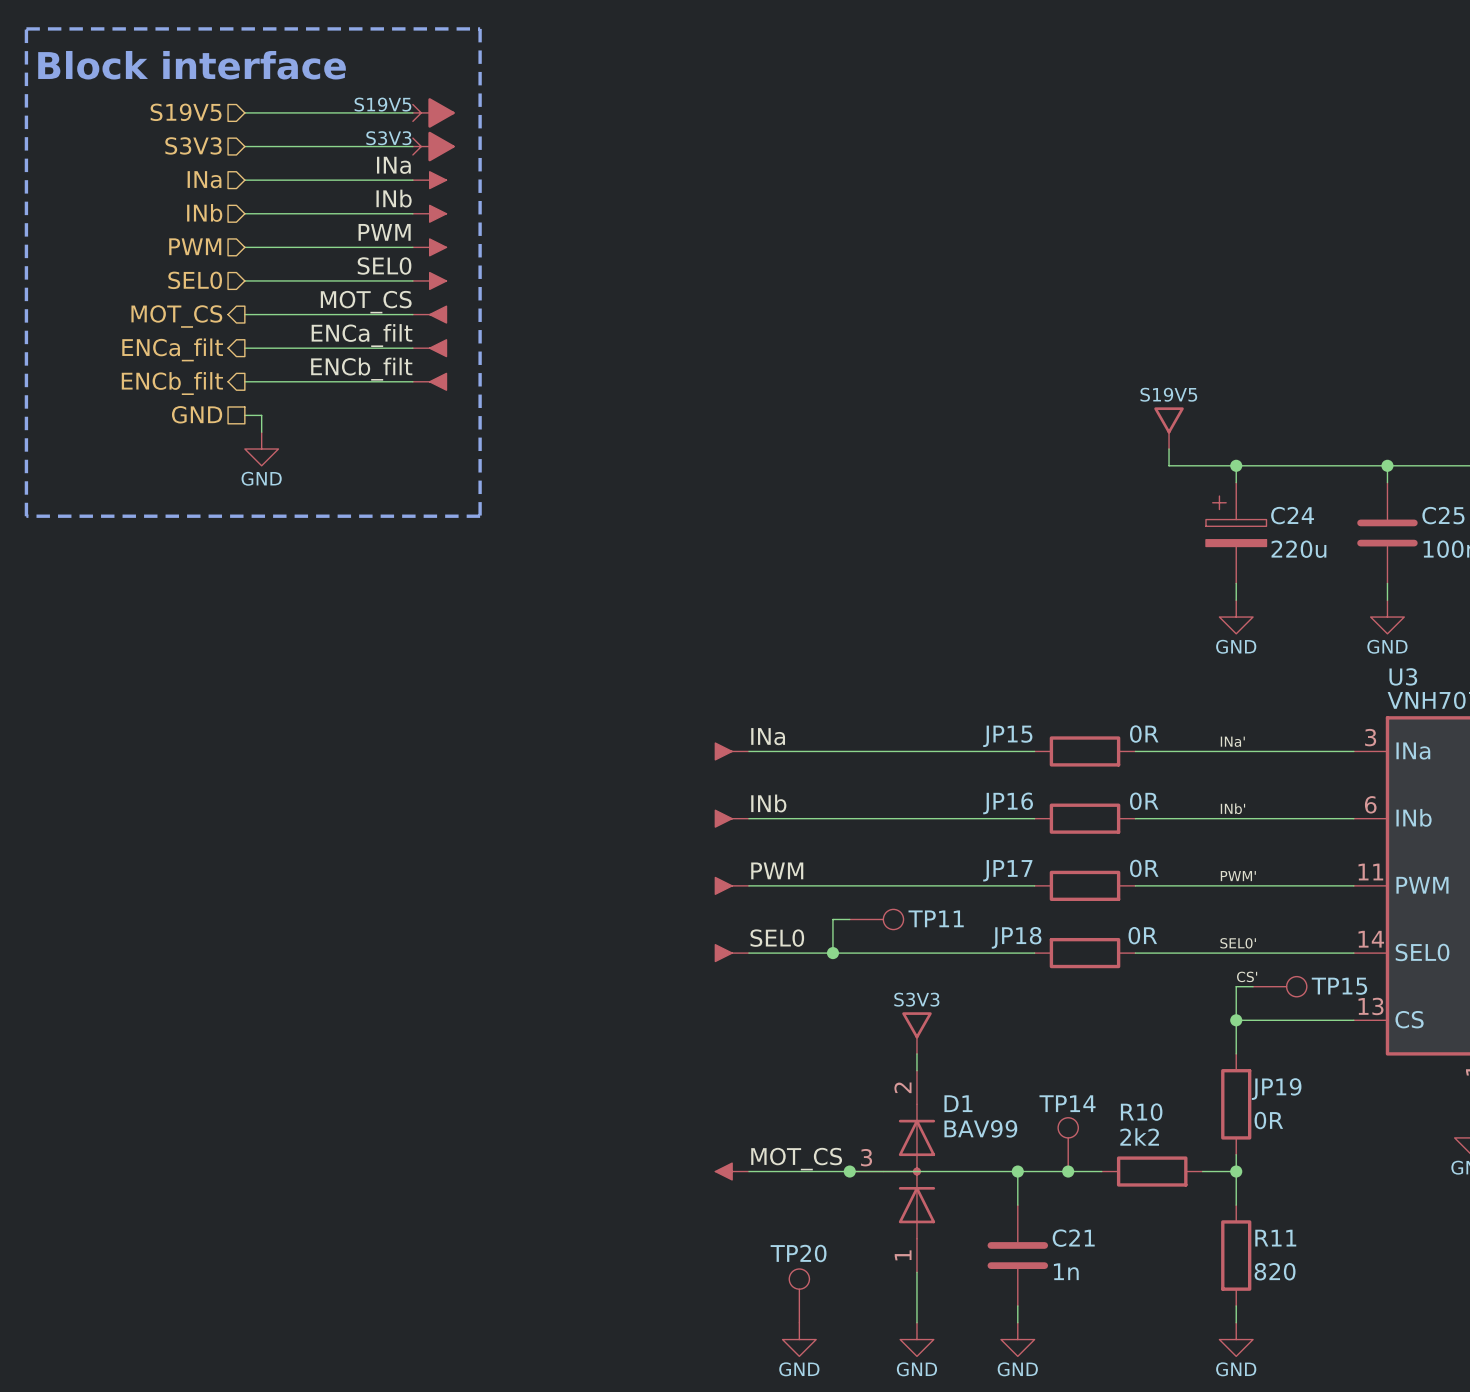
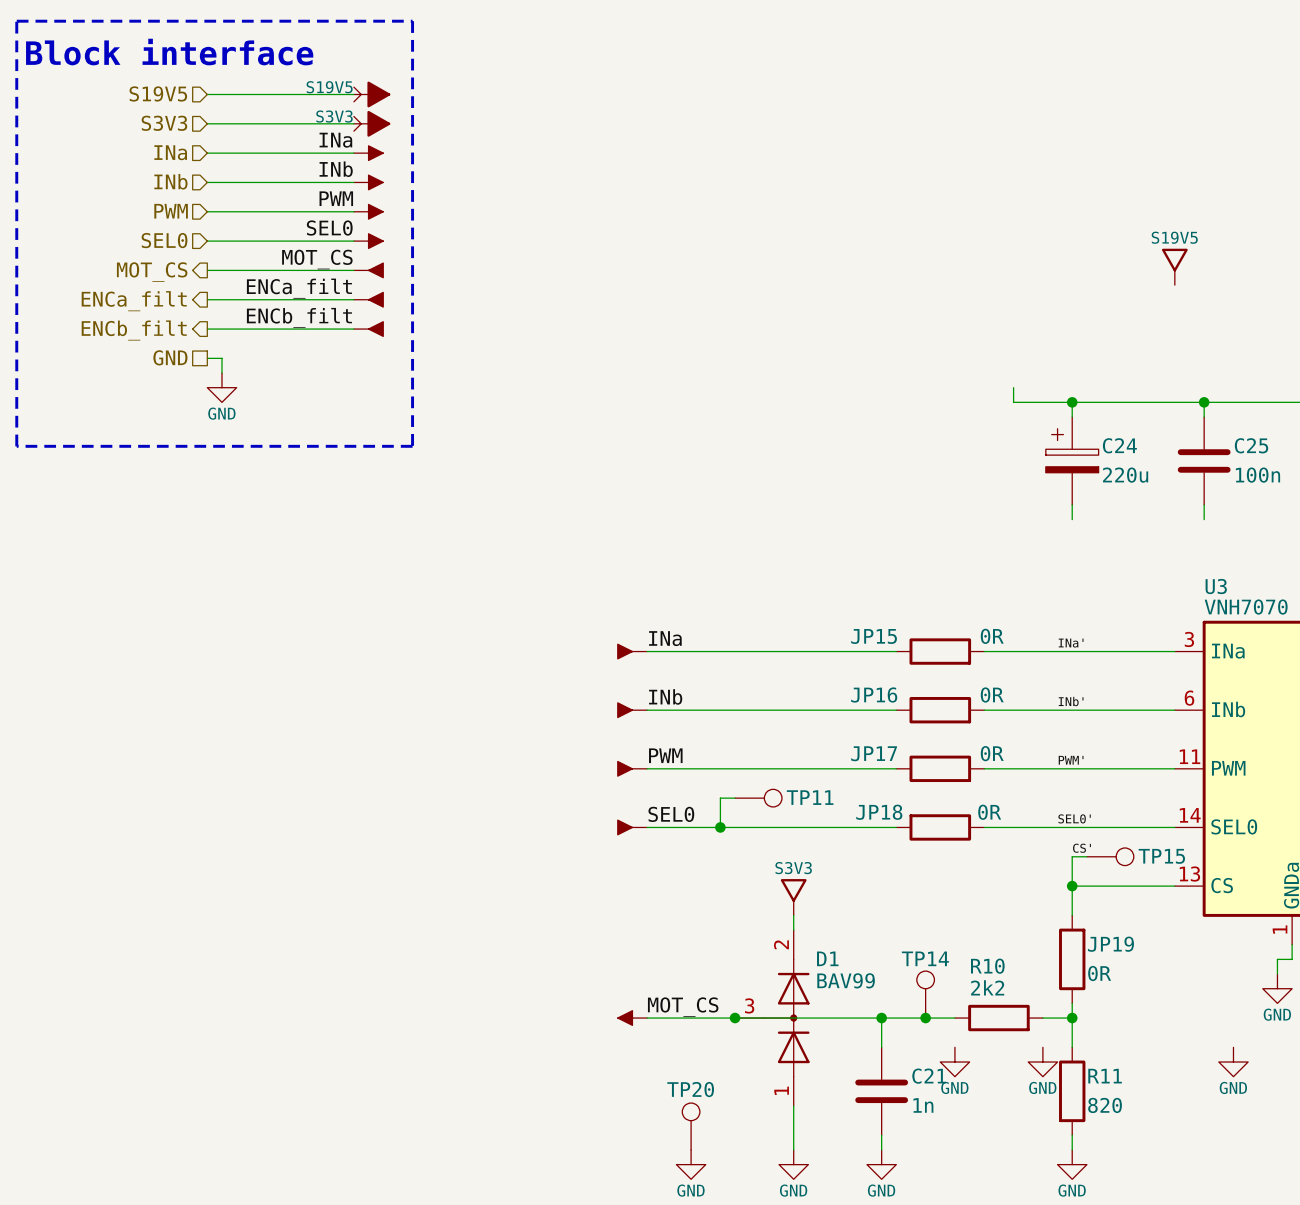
power symbol position: S19V5 (1169, 428) -> S19V5 (1174, 266)
power symbol: GND (1236, 617) -> none
power symbol: GND (1387, 617) -> none
power symbol: none -> GND (954, 1062)
power symbol: none -> GND (1042, 1062)
power symbol: none -> GND (1233, 1062)

